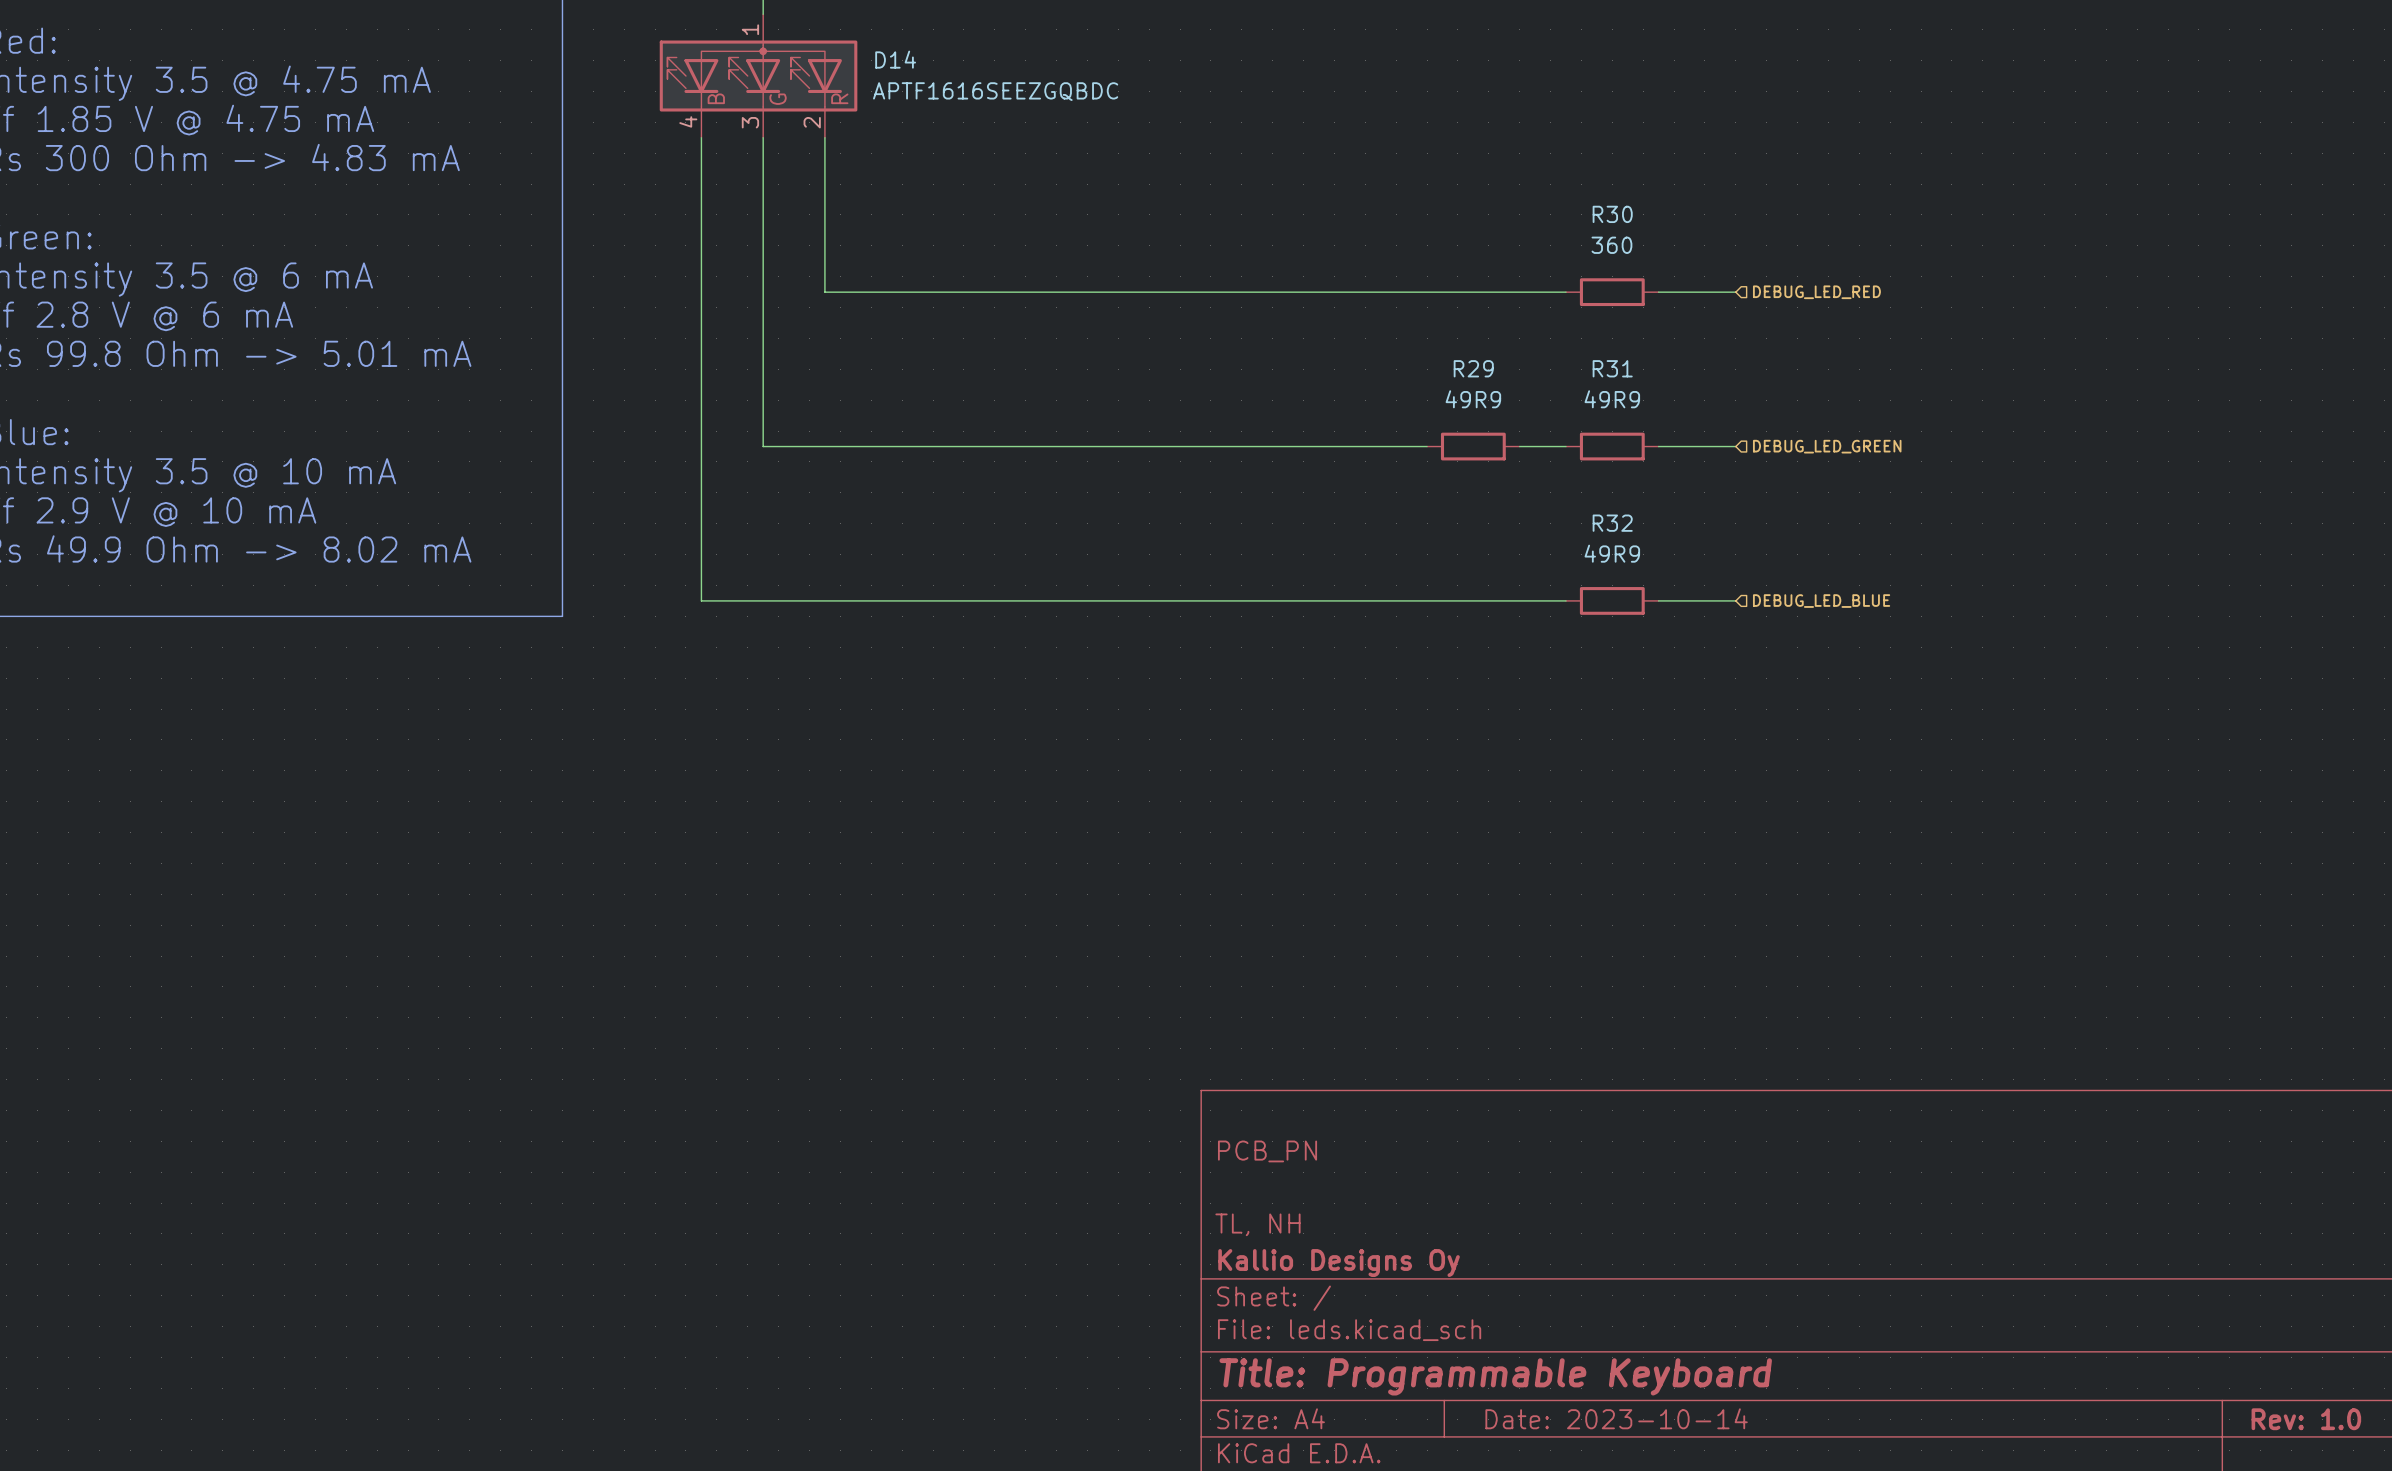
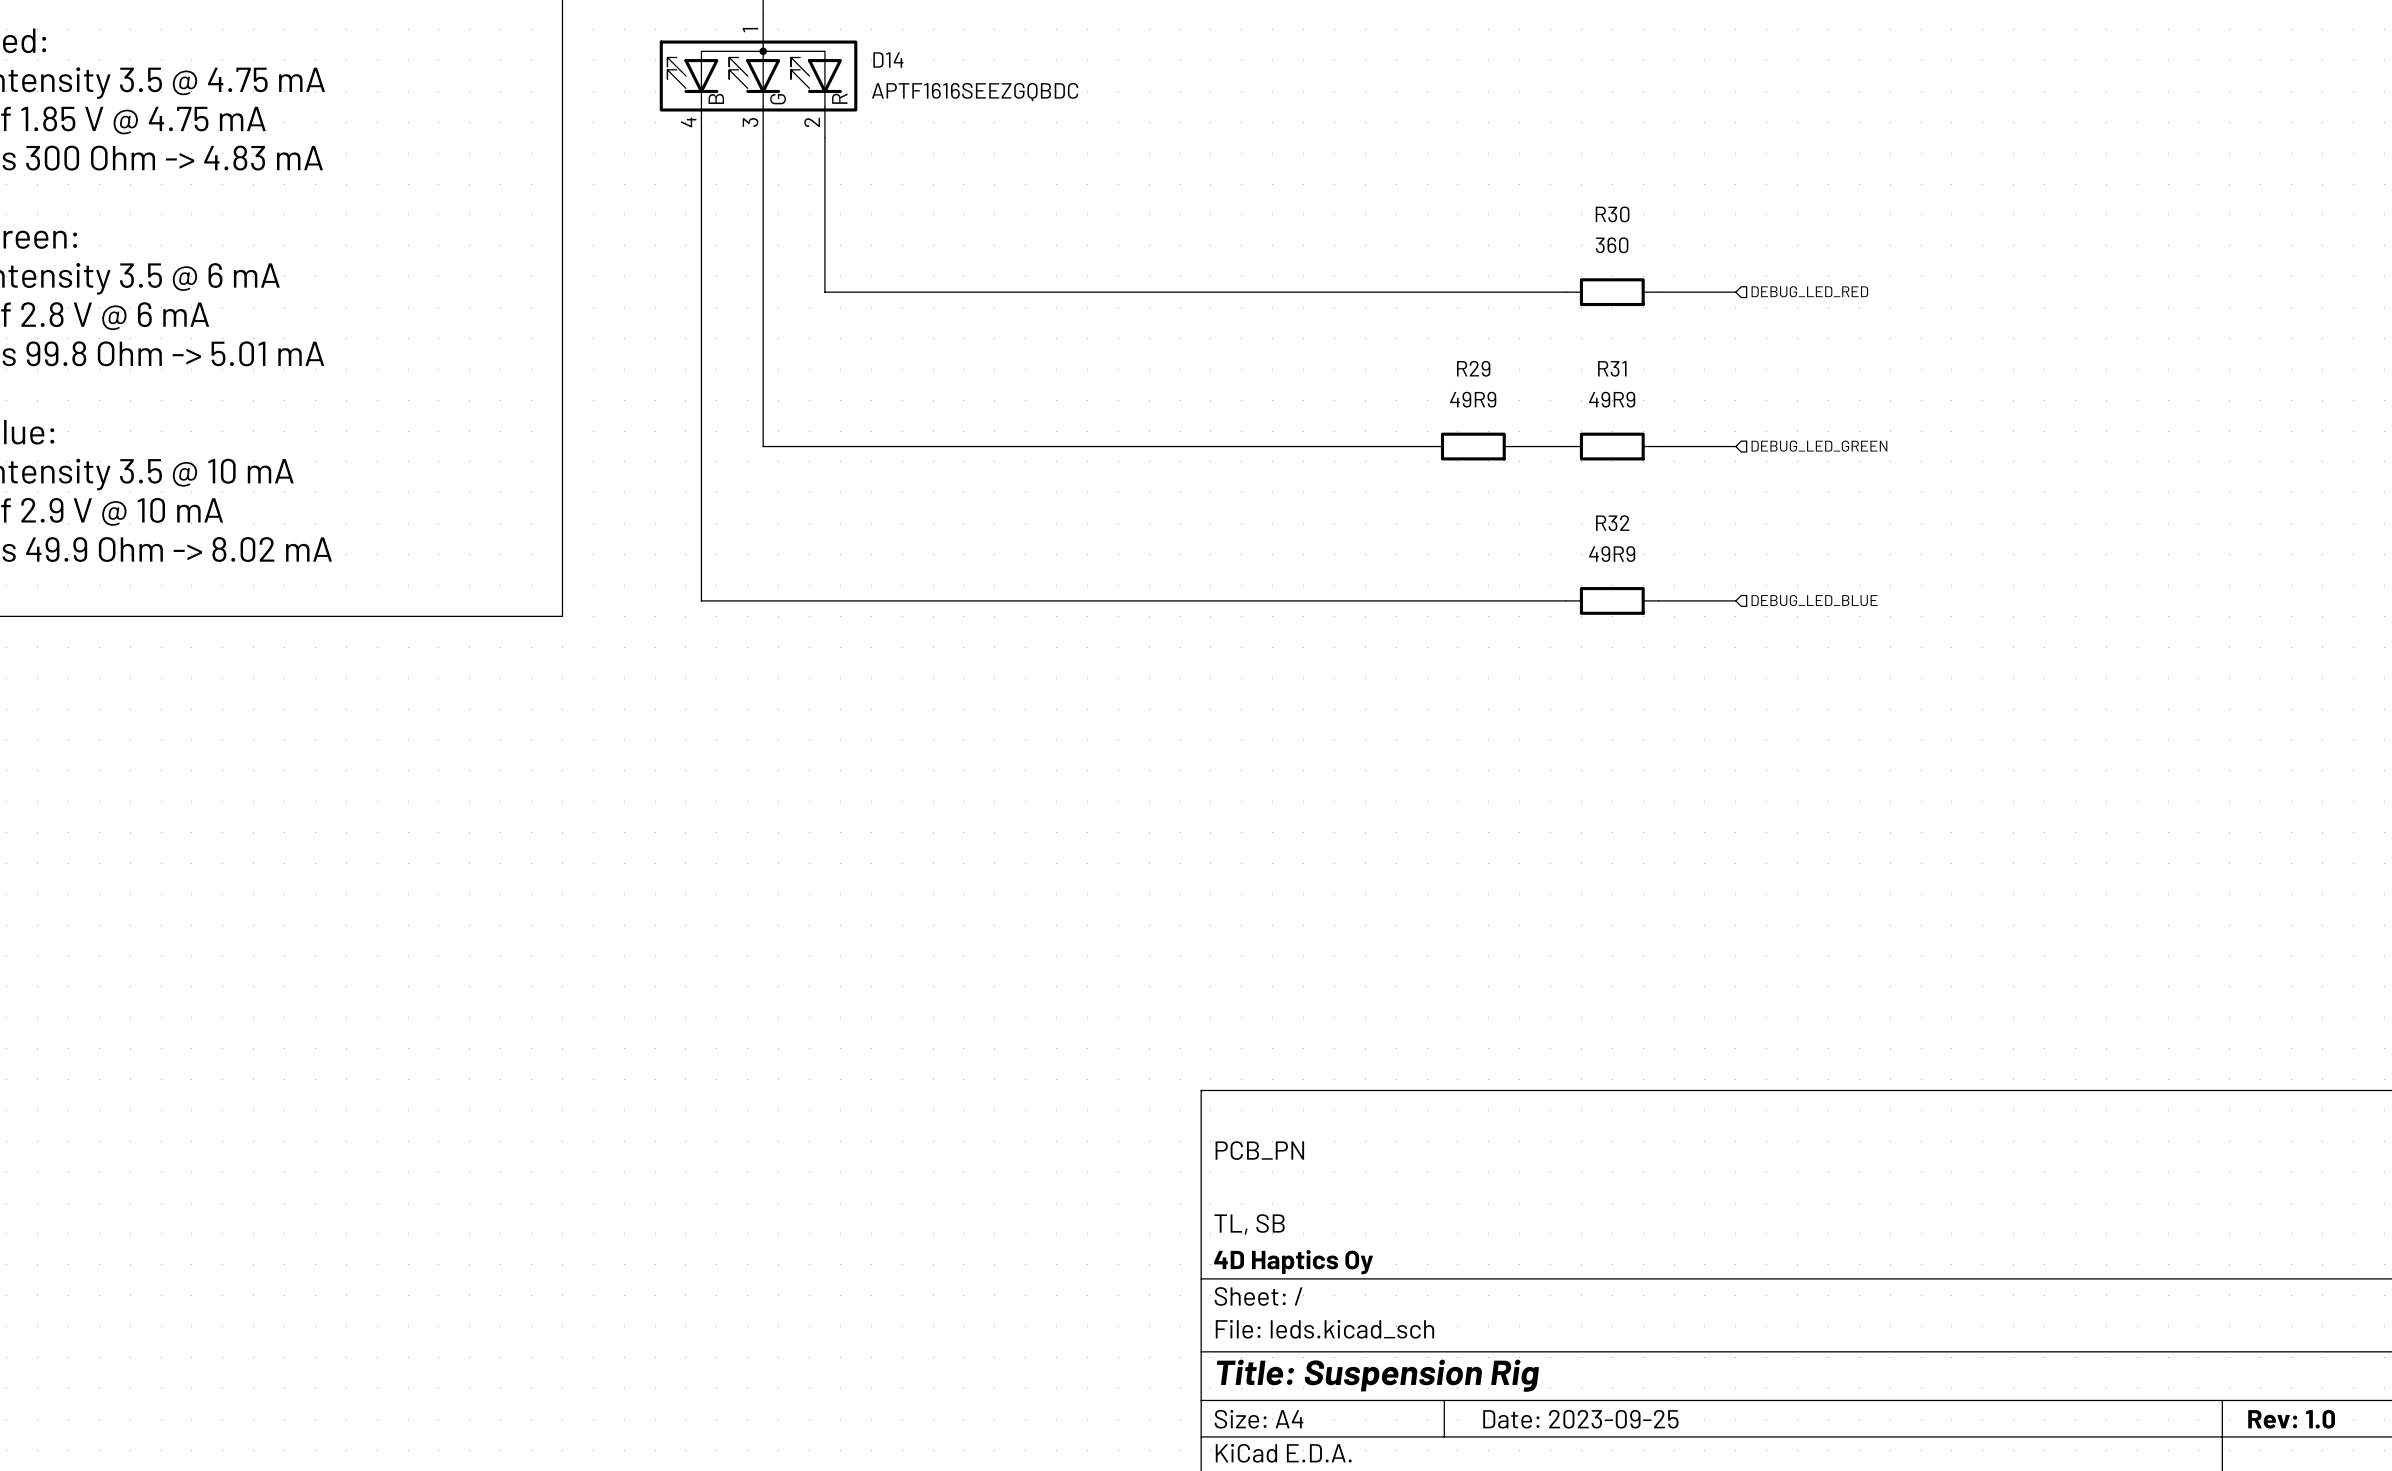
title block: TL, NH (1257, 1224) -> TL, SB (1249, 1224)
title block: Kallio Designs Oy (1339, 1263) -> 4D Haptics Oy (1293, 1262)
title block: Title: Programmable Keyboard (1495, 1376) -> Title: Suspension Rig (1377, 1375)
title block: Date: 2023-10-14 (1616, 1418) -> Date: 2023-09-25 (1580, 1419)

